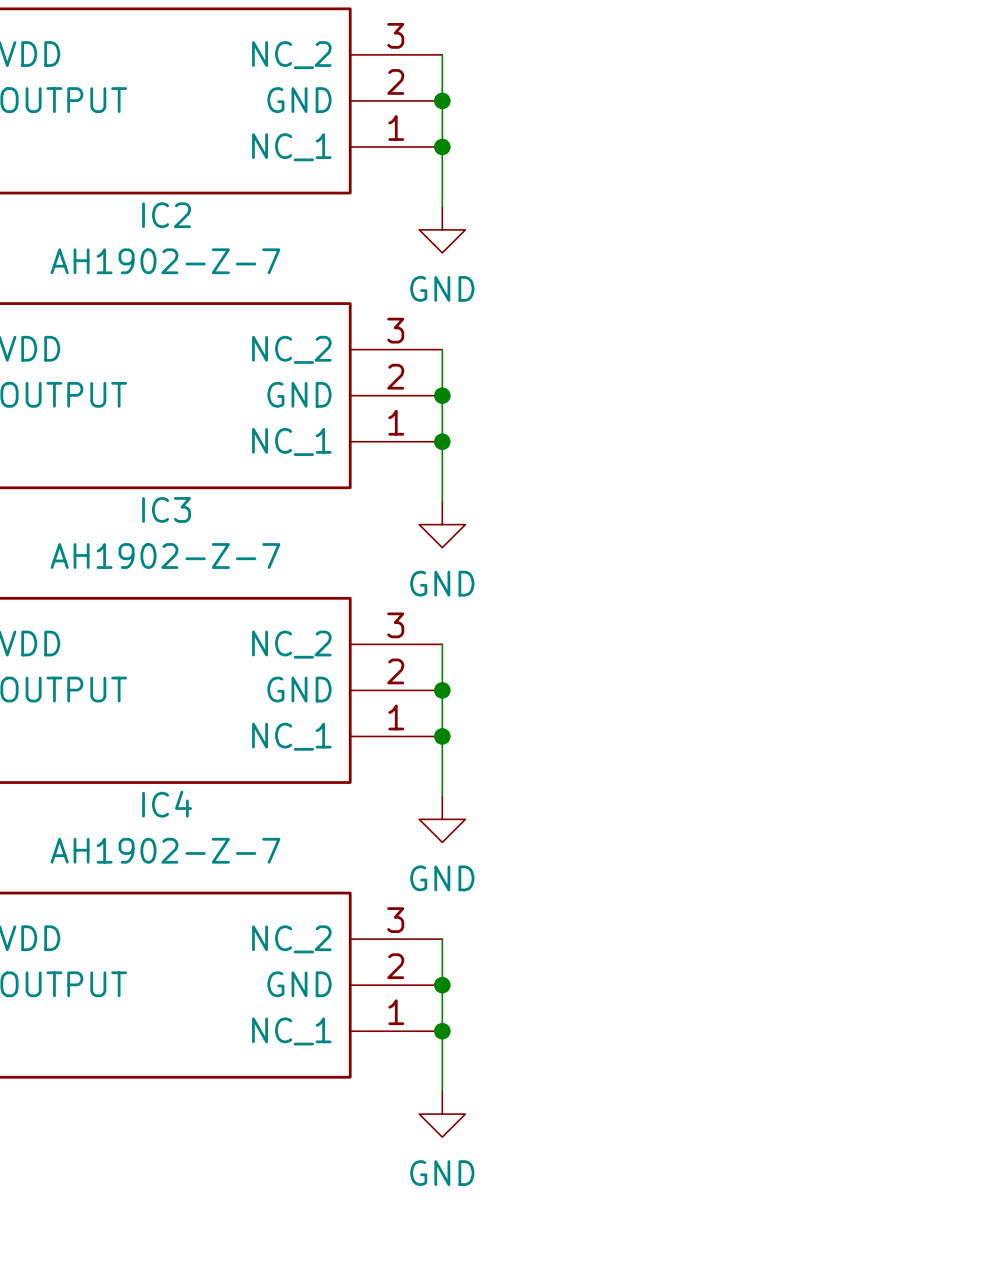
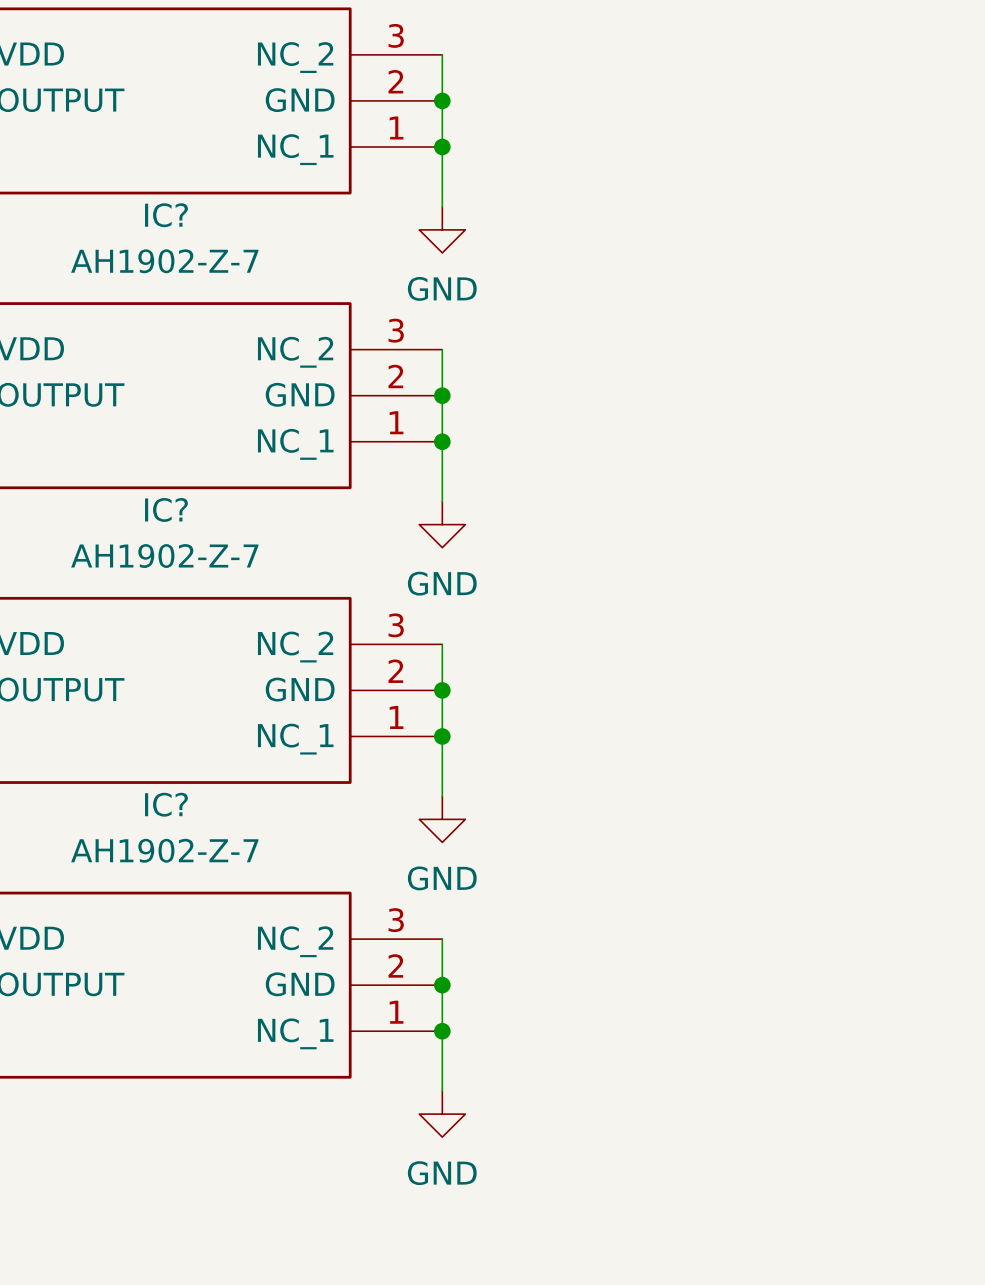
IC2 name: IC2 (166, 215) -> IC? (166, 215)
IC3 name: IC3 (166, 509) -> IC? (166, 509)
IC4 name: IC4 (167, 804) -> IC? (166, 804)

